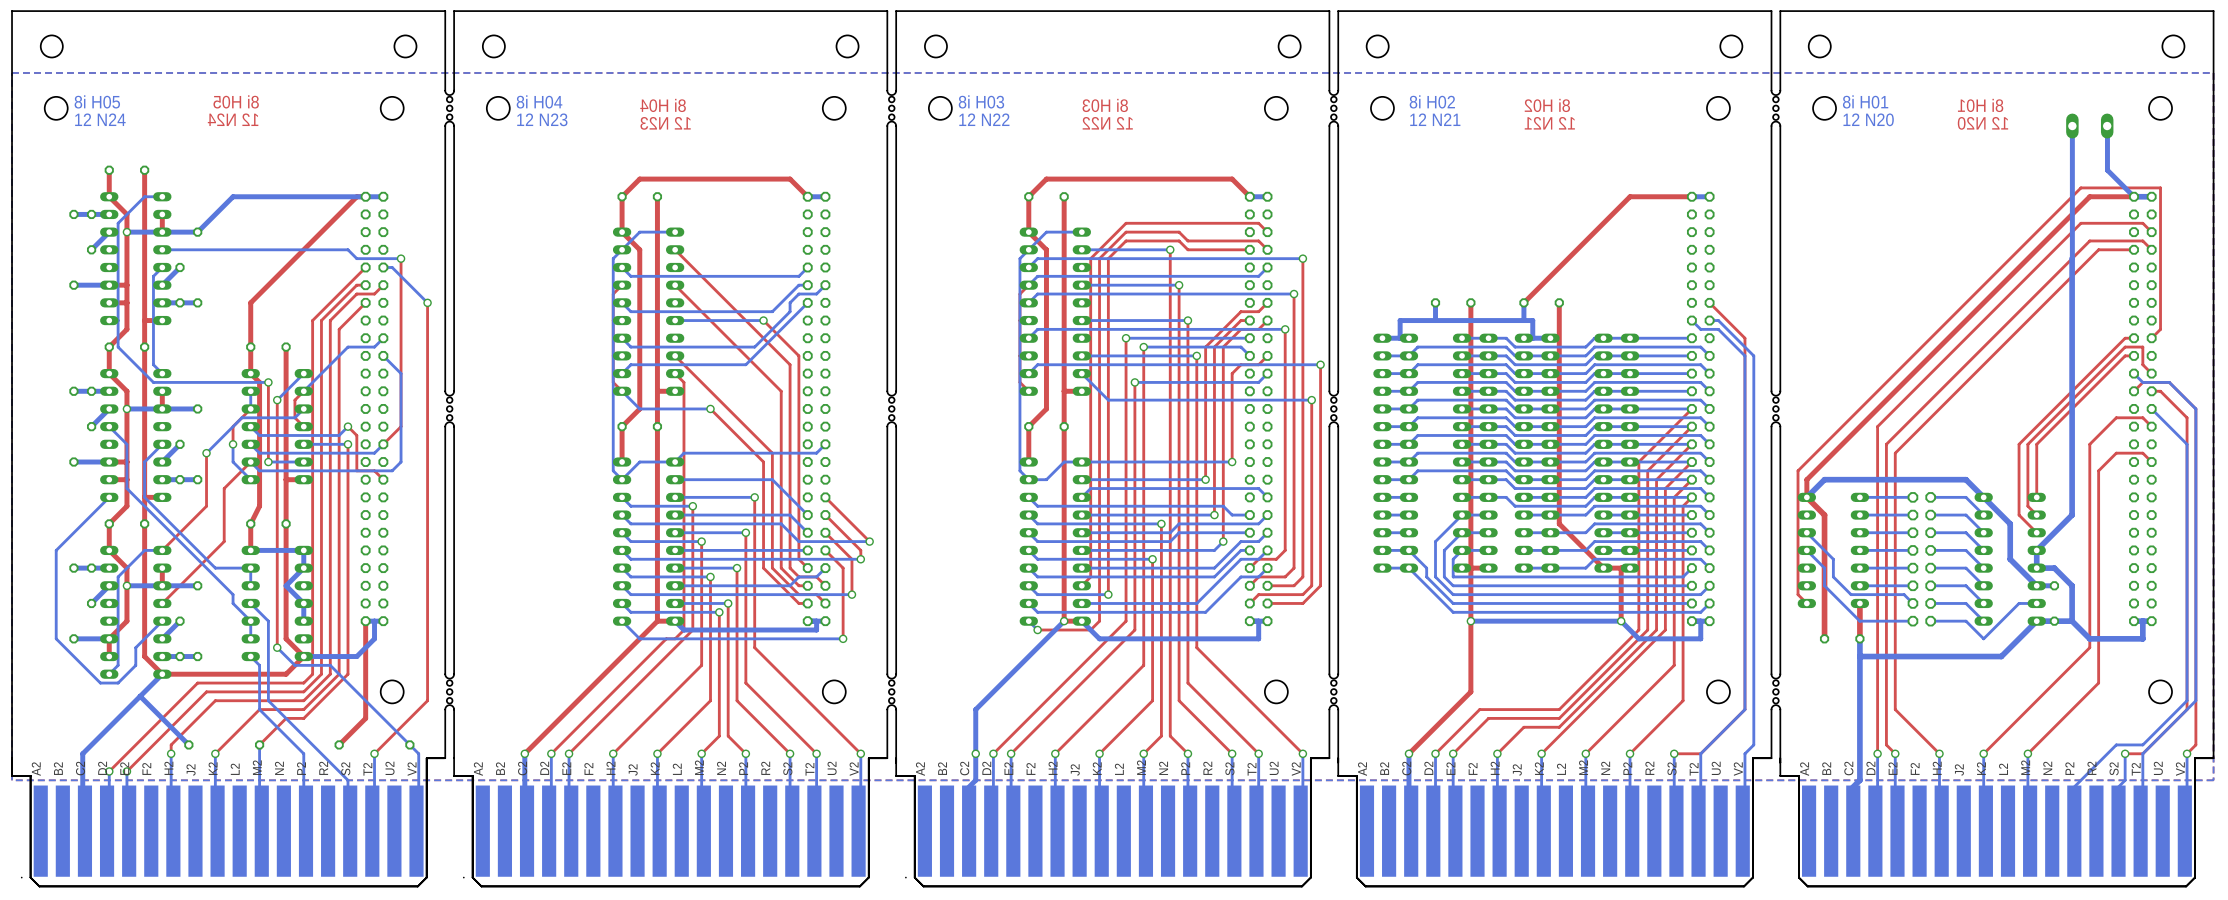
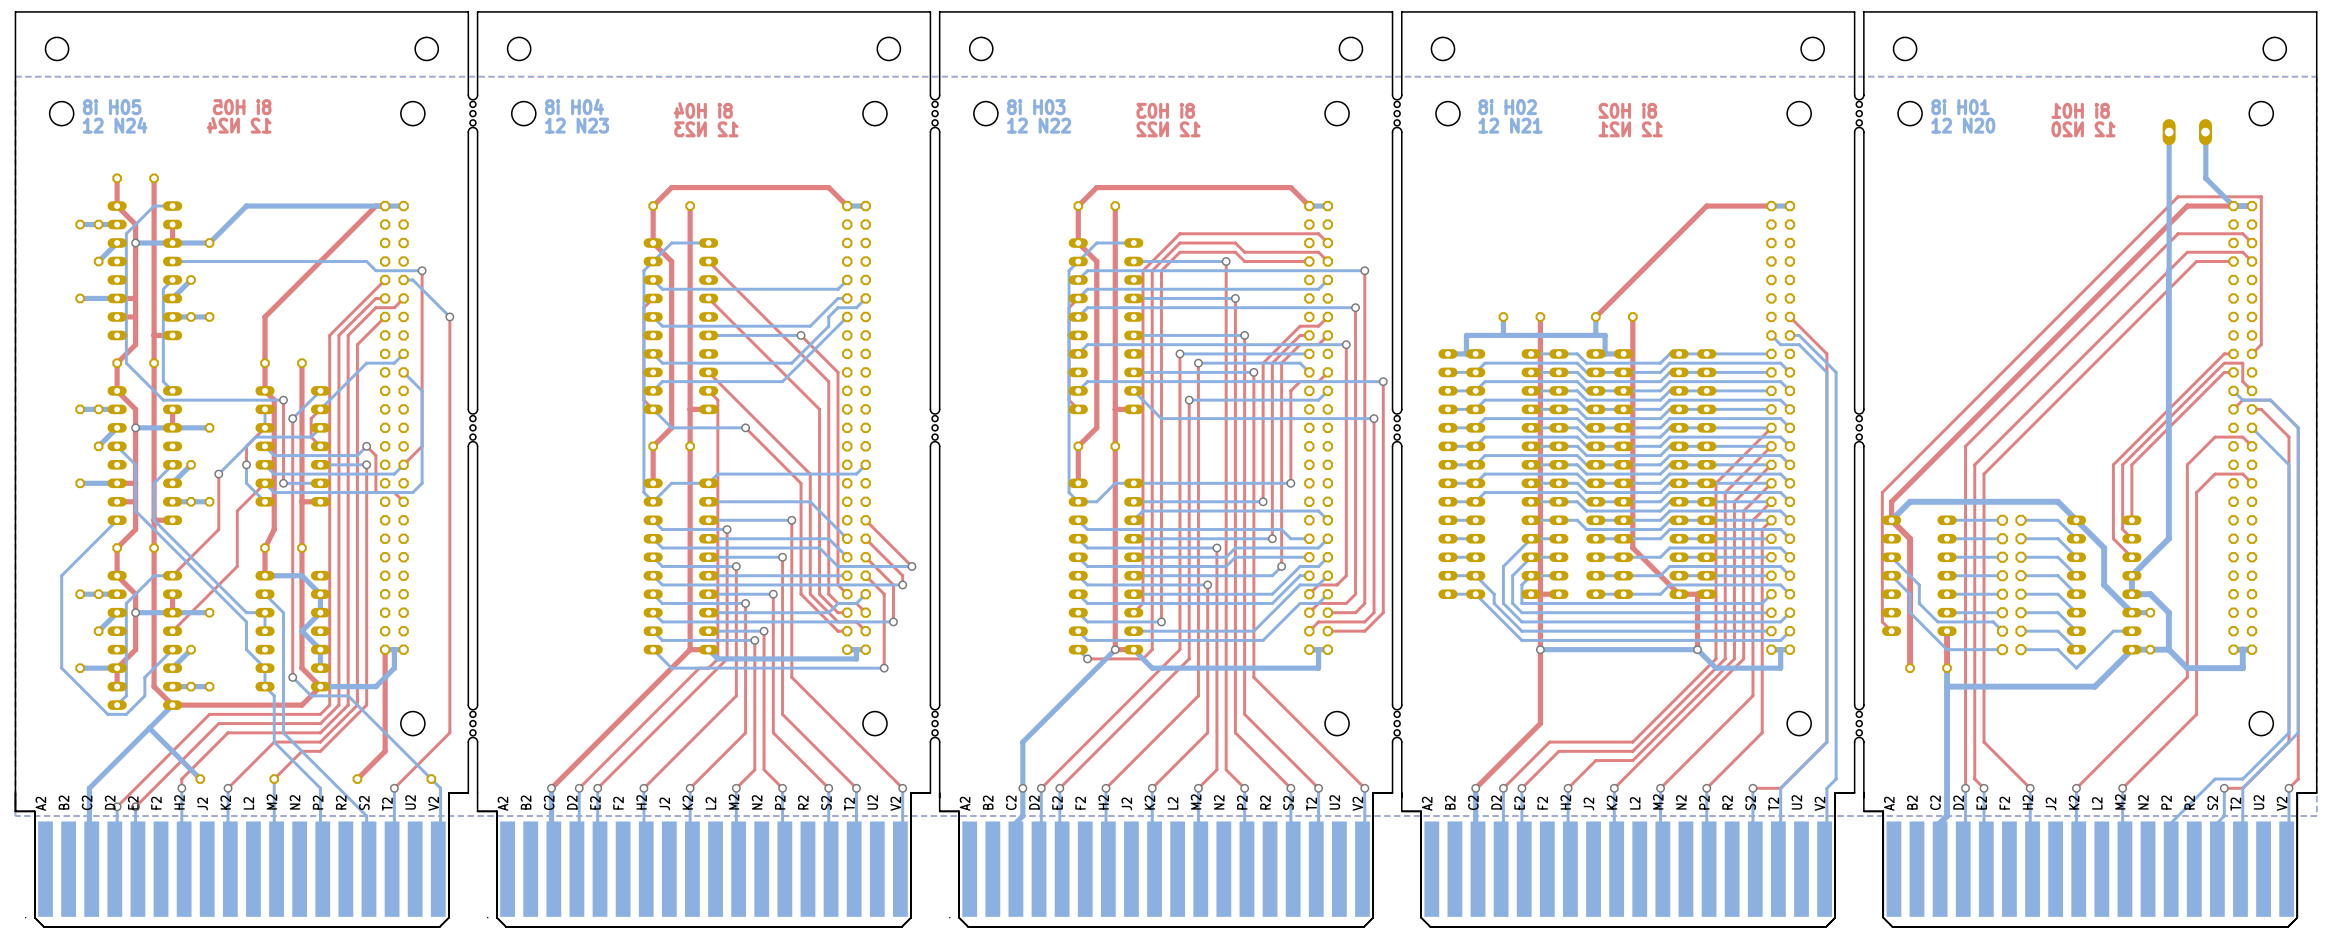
bottom track: (286, 550) (303, 550) (303, 568) (286, 585) (303, 603) (303, 621) -> (301, 575) (320, 594) (320, 612) (301, 631) (320, 649) (320, 668)
bottom track: (215, 568) (250, 568) (250, 585) -> (228, 594) (246, 612) (265, 612) (265, 631)
bottom track: (233, 603) (250, 621) (250, 638) -> (246, 631) (246, 649) (265, 668) (265, 686)
bottom track: (250, 603) (268, 621) -> (265, 594) (283, 612) (283, 649)

